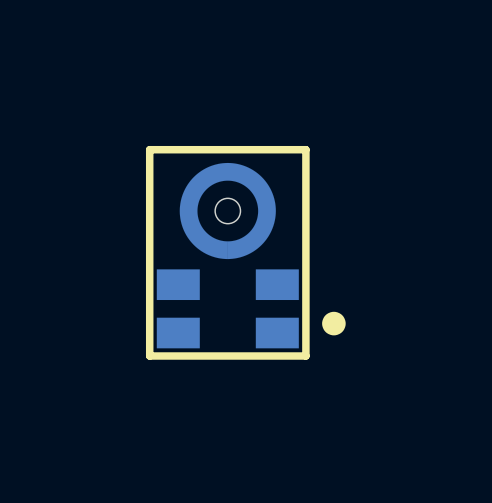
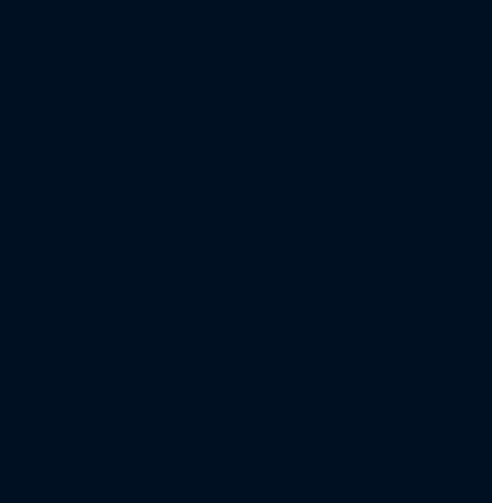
part: (245, 252) -> none

